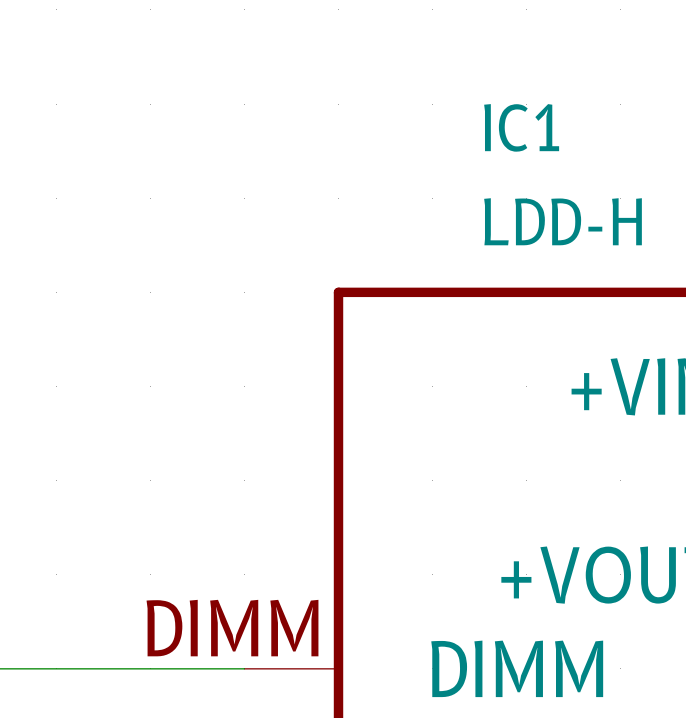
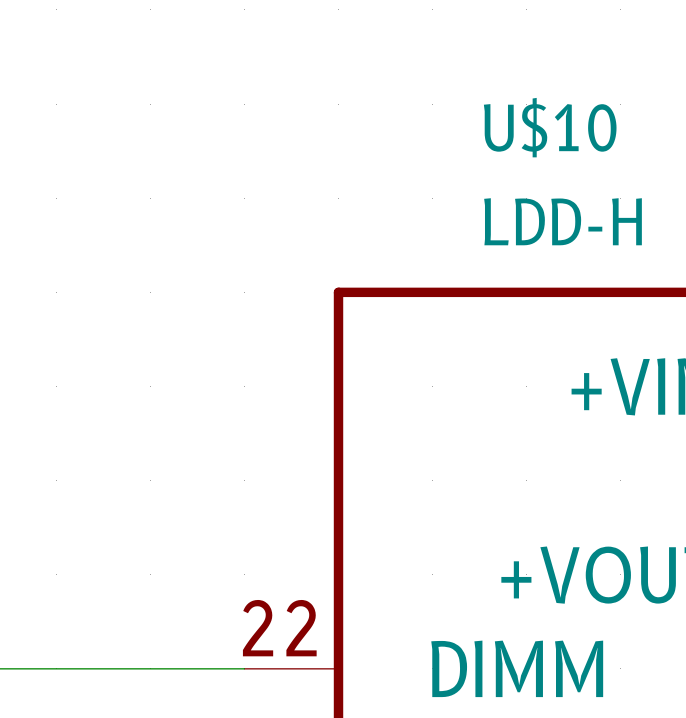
IC1 name: IC1 (521, 127) -> U$10 (550, 127)
IC1 pin number: DIMM (232, 628) -> 22 (279, 628)

